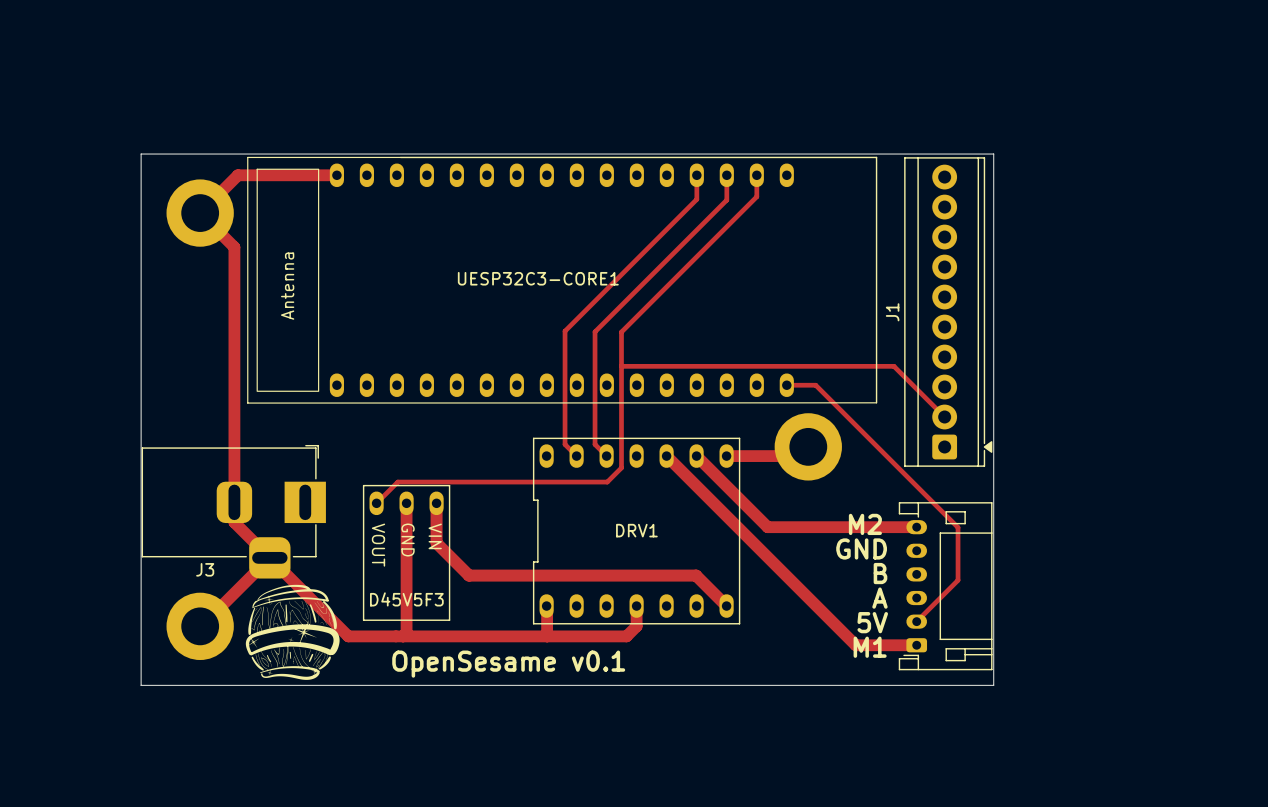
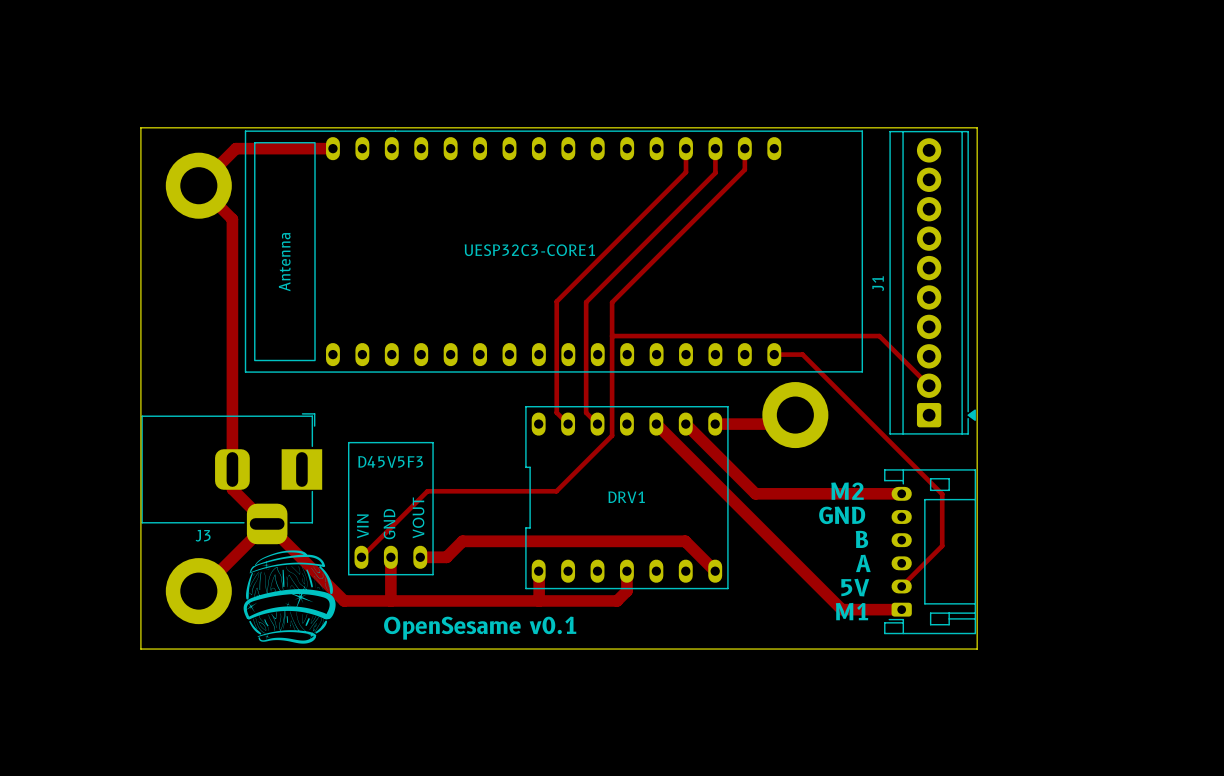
track: (607, 482) (397, 482) (376, 503) -> (598, 449) (556, 491) (427, 491) (361, 557)
track: (406, 503) (406, 632) (403, 636) -> none
track: (436, 503) (436, 543) (469, 575) -> (420, 557) (446, 557) (462, 541)
D45V5F3 rotation: 0° (406, 552) -> 180° (390, 508)
track: none -> (390, 557) (390, 600)

